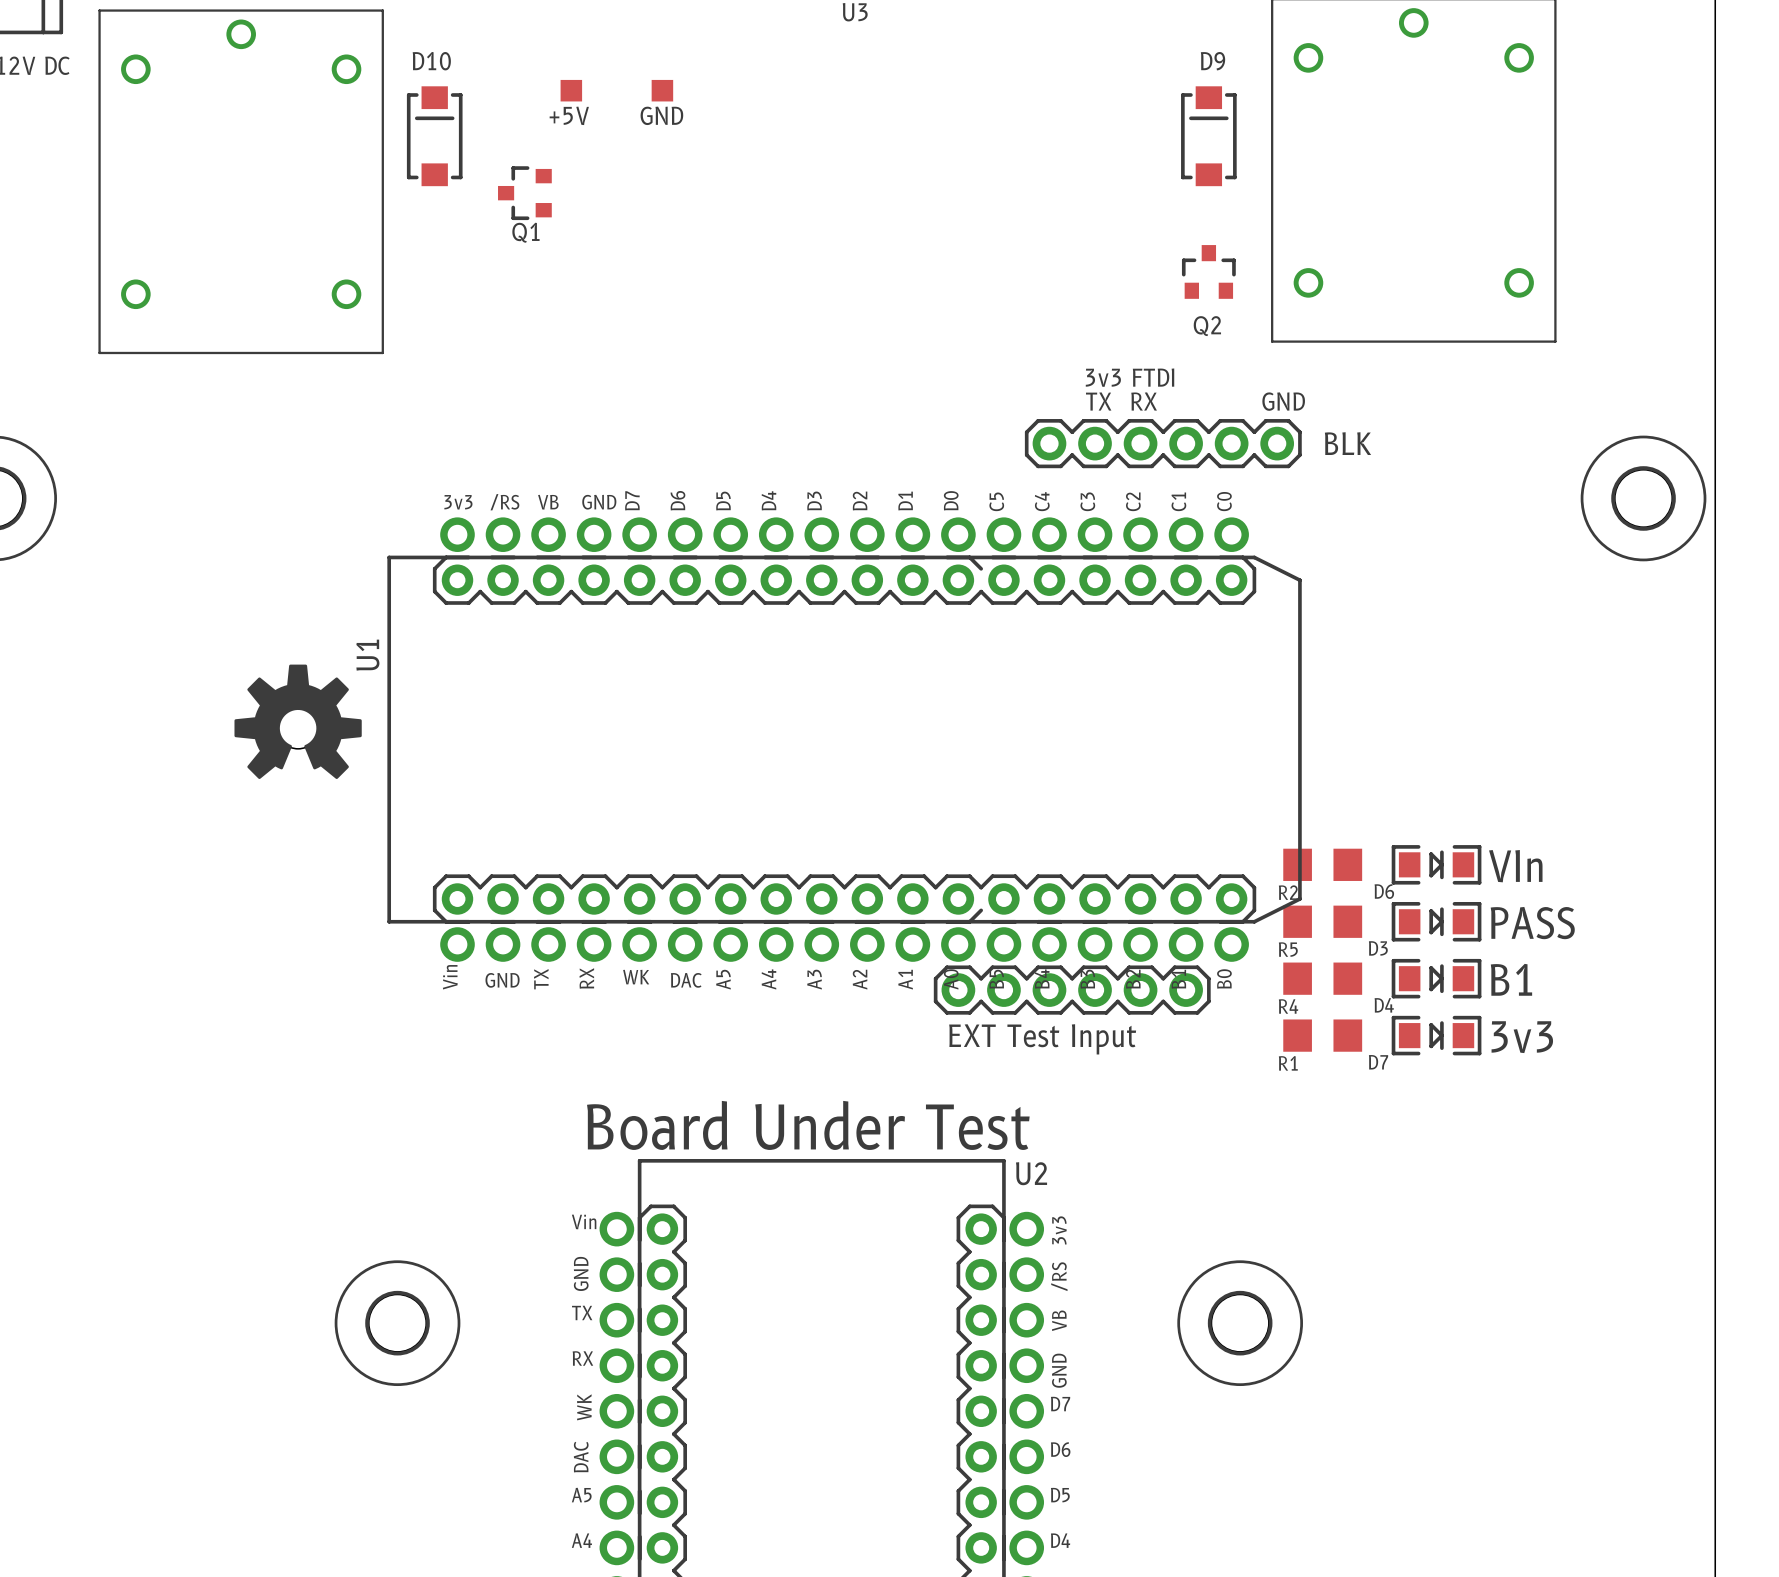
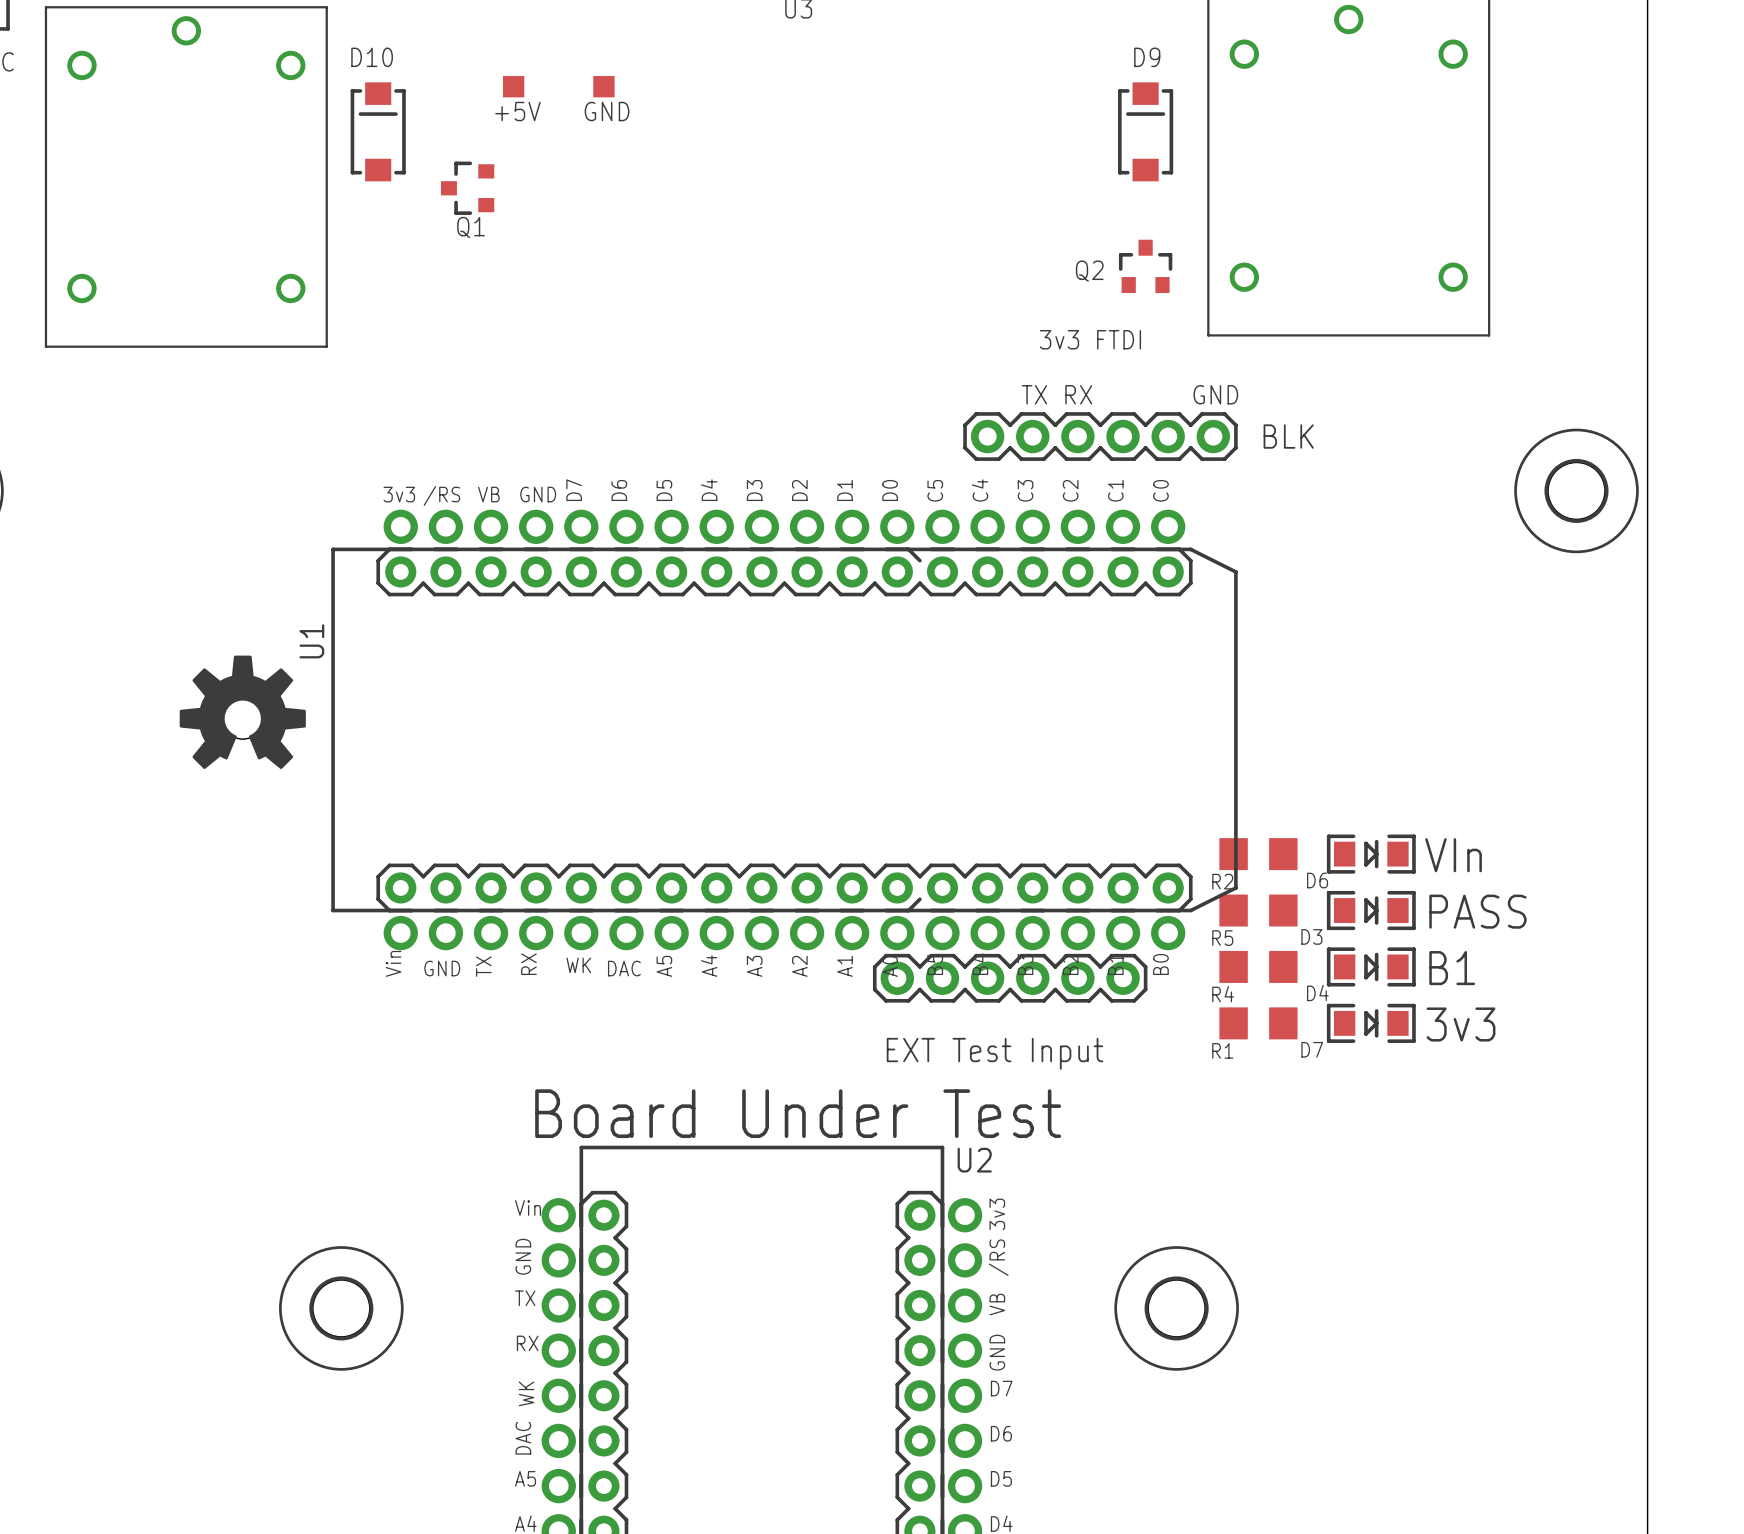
Q2 name position: Q2 (1207, 326) -> Q2 (1089, 271)
text position: 3v3 FTDI (1130, 377) -> 3v3 FTDI (1090, 339)
text position: EXT Test Input (1042, 1039) -> EXT Test Input (995, 1053)

